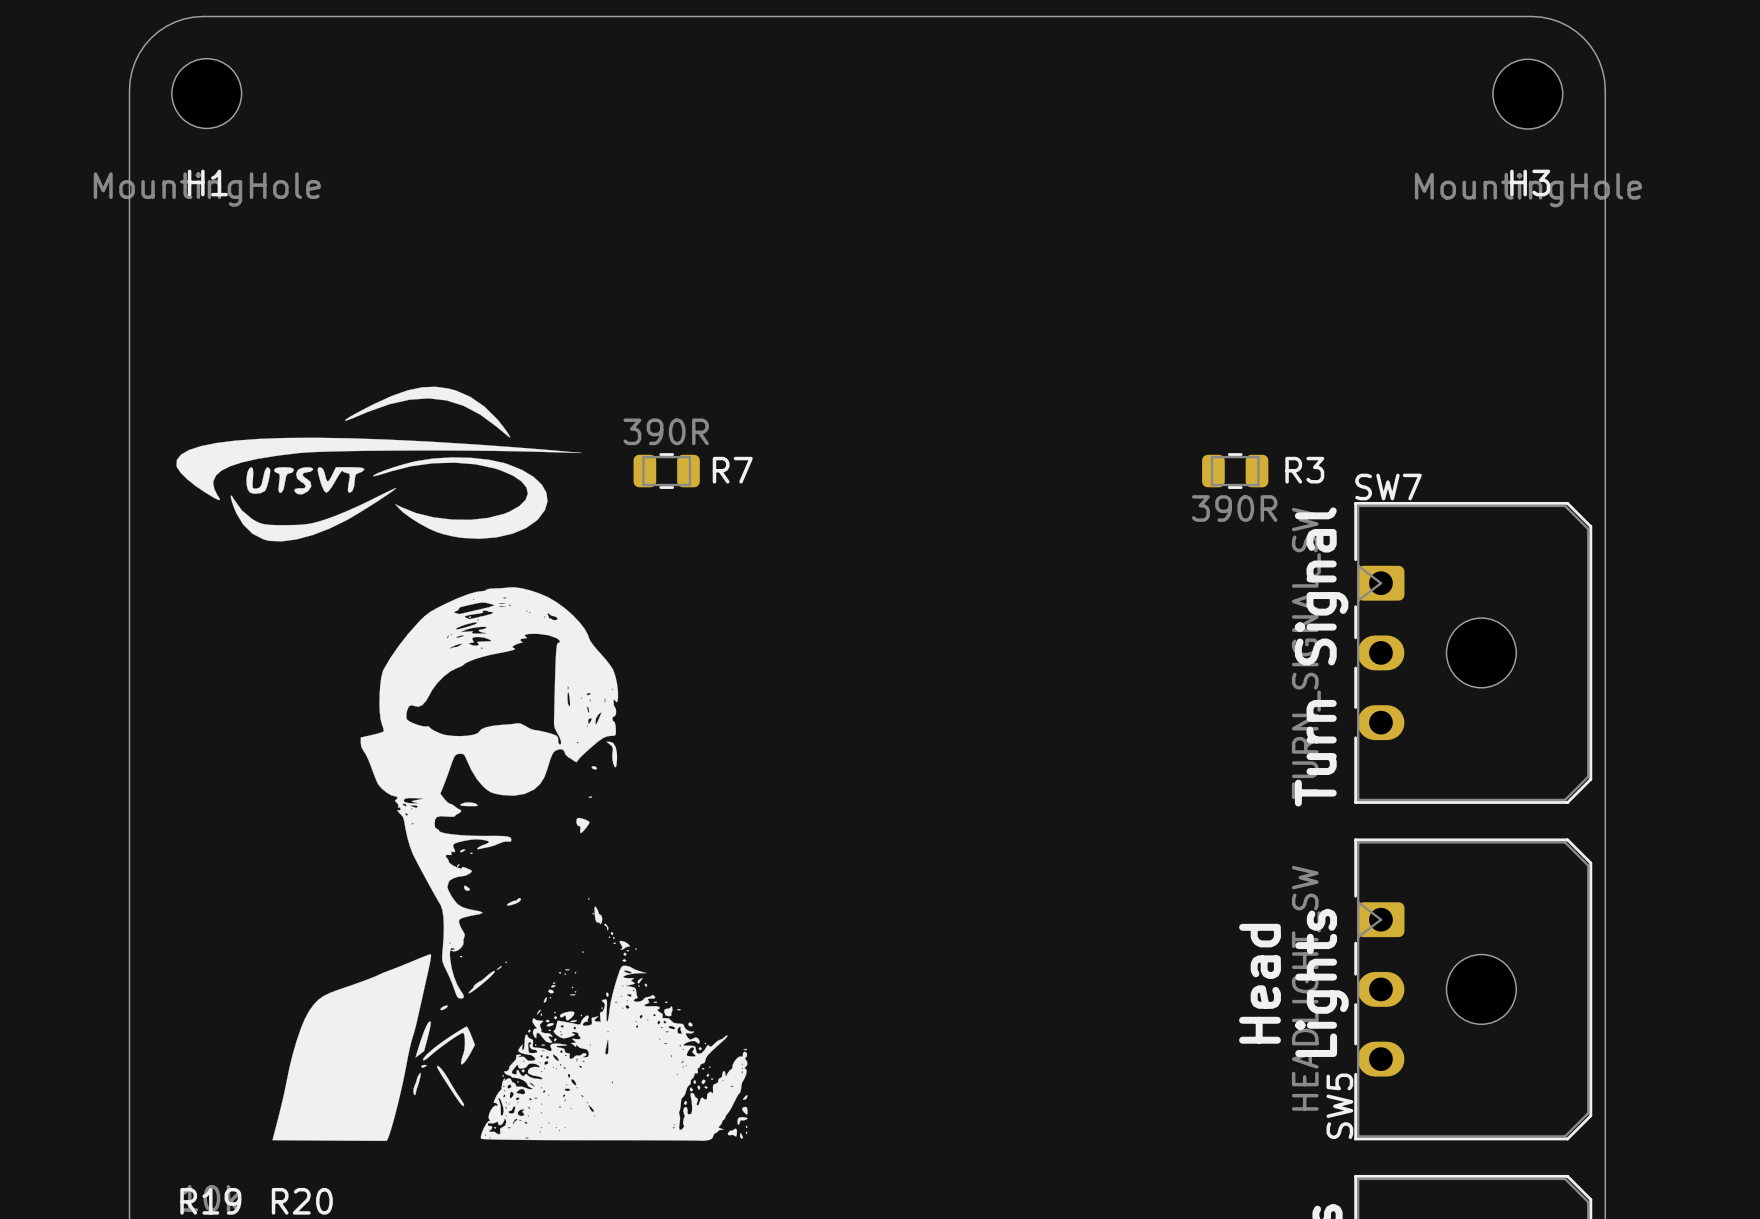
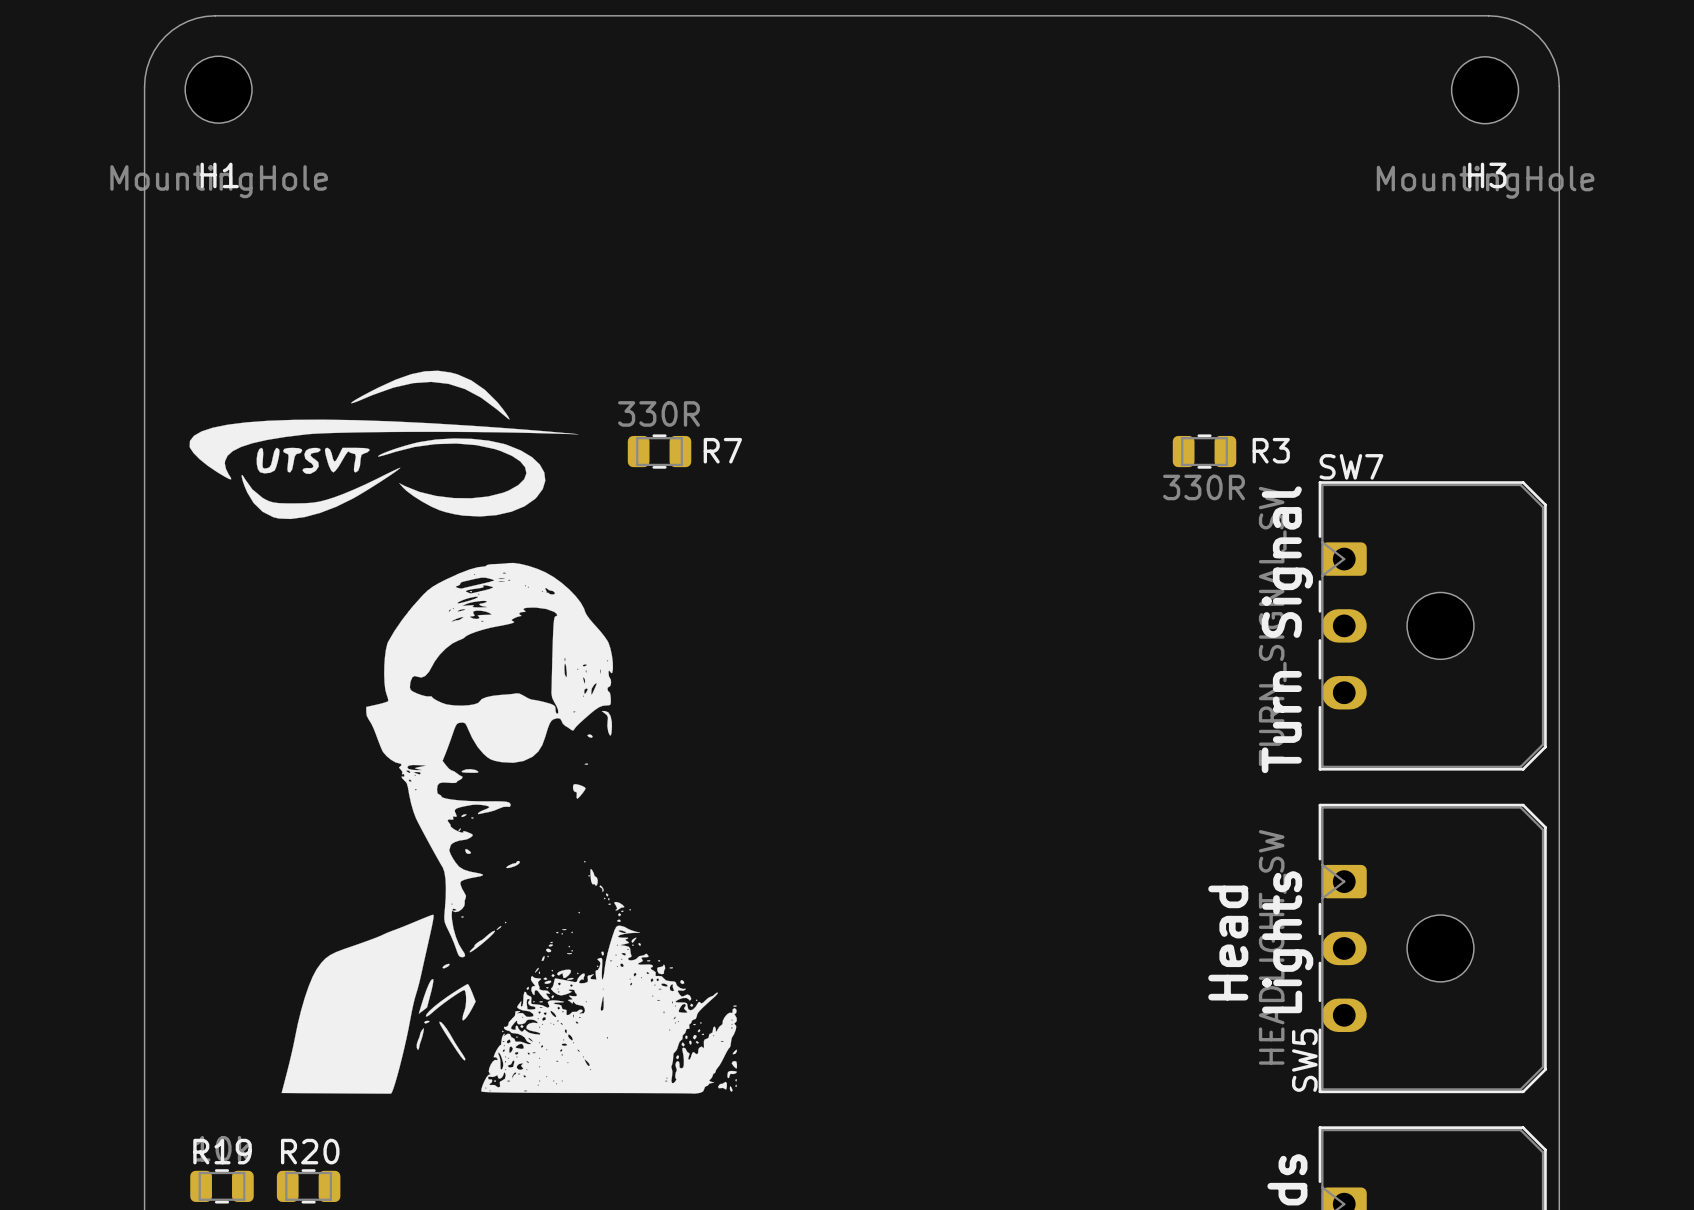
R7 value: 390R (666, 431) -> 330R (659, 413)
R3 value: 390R (1234, 508) -> 330R (1204, 487)

